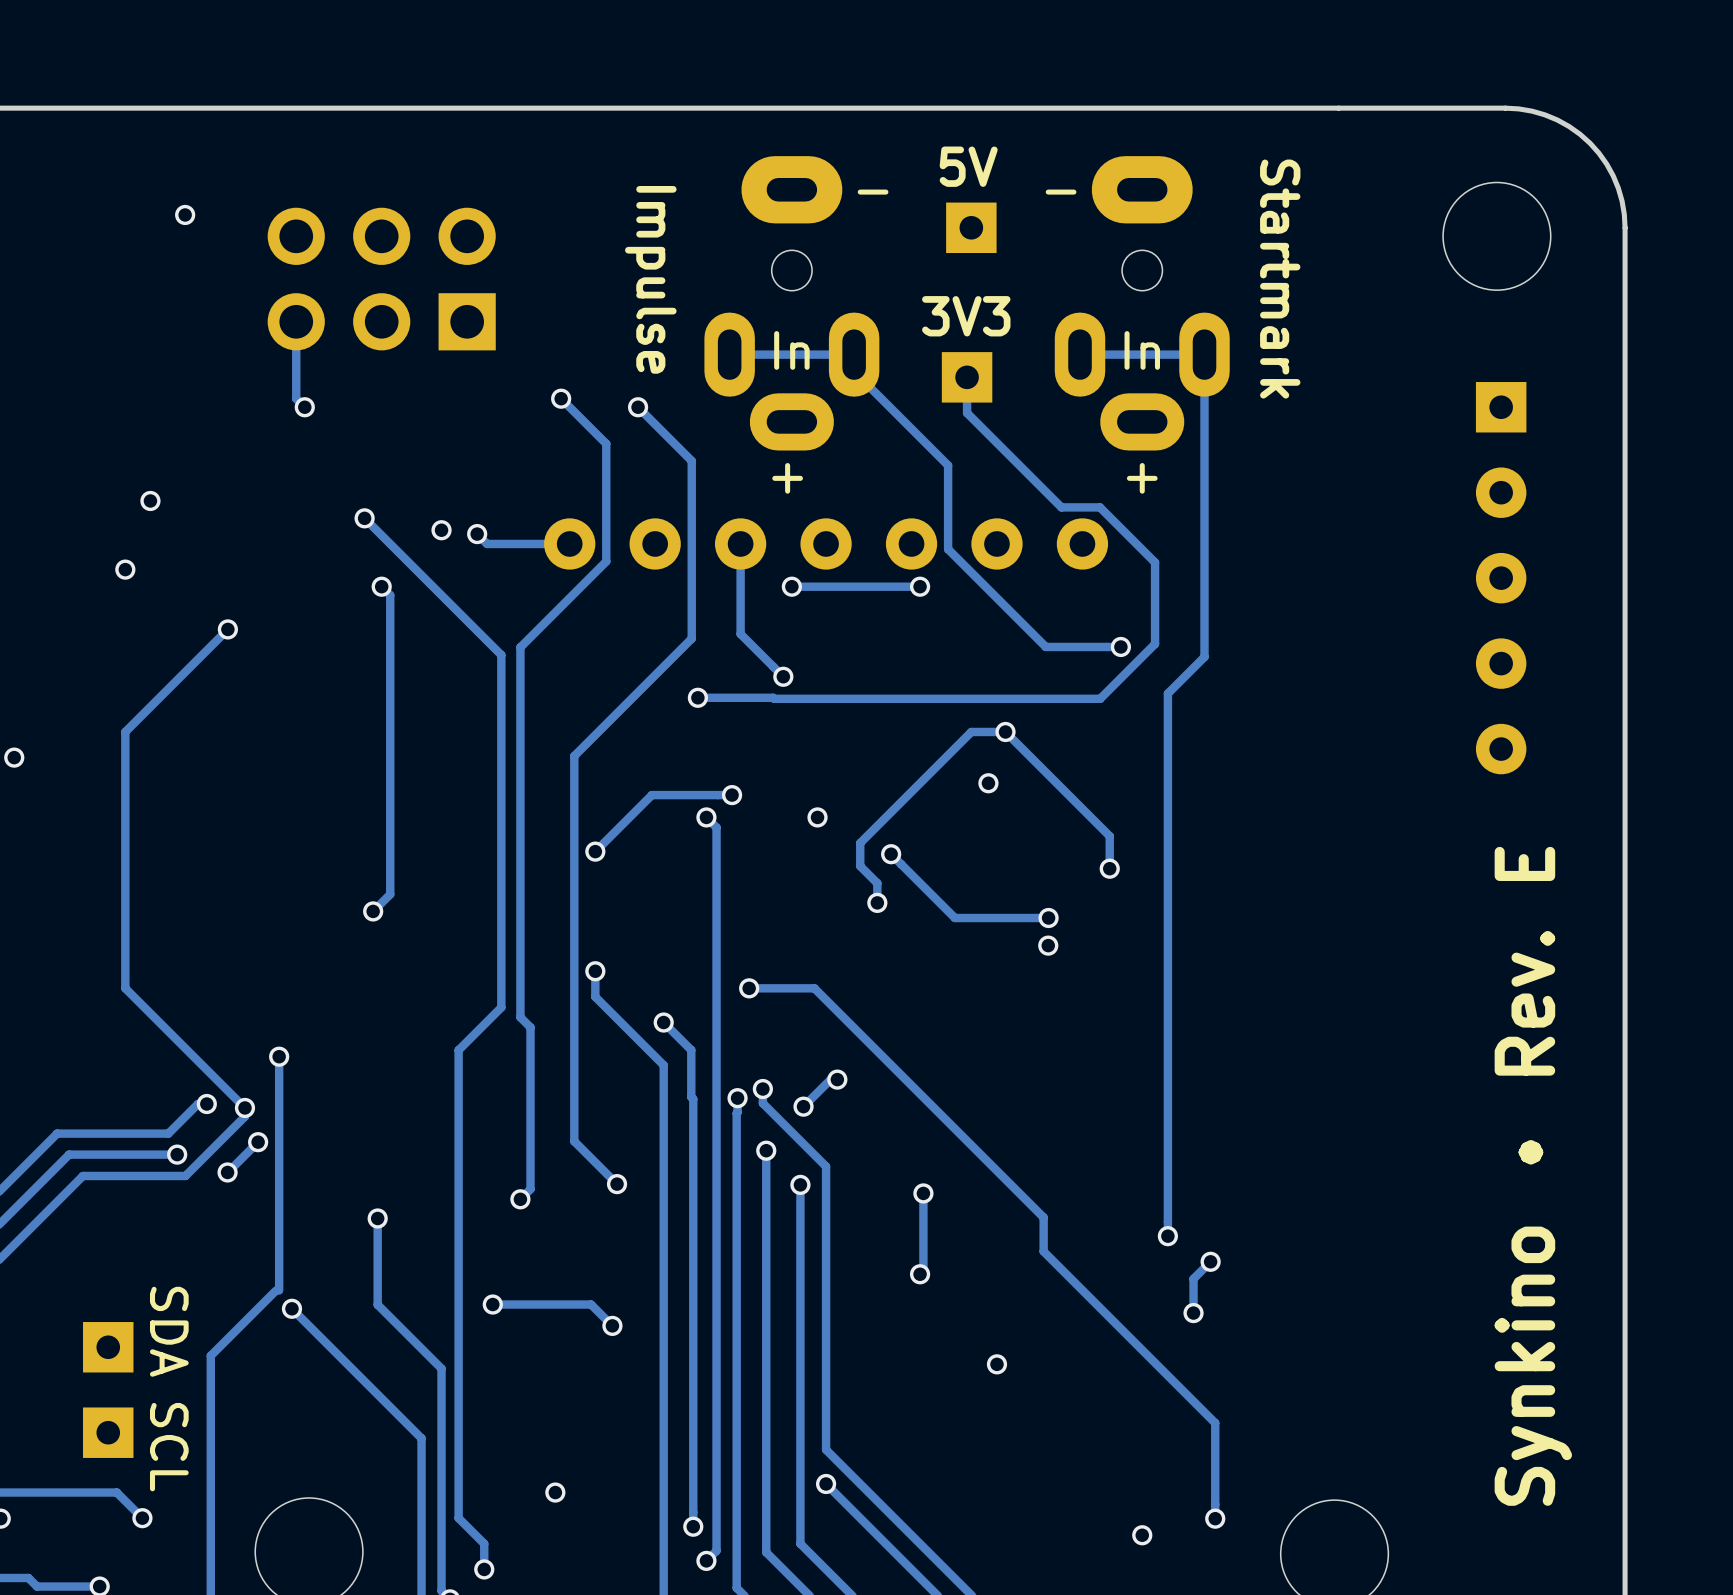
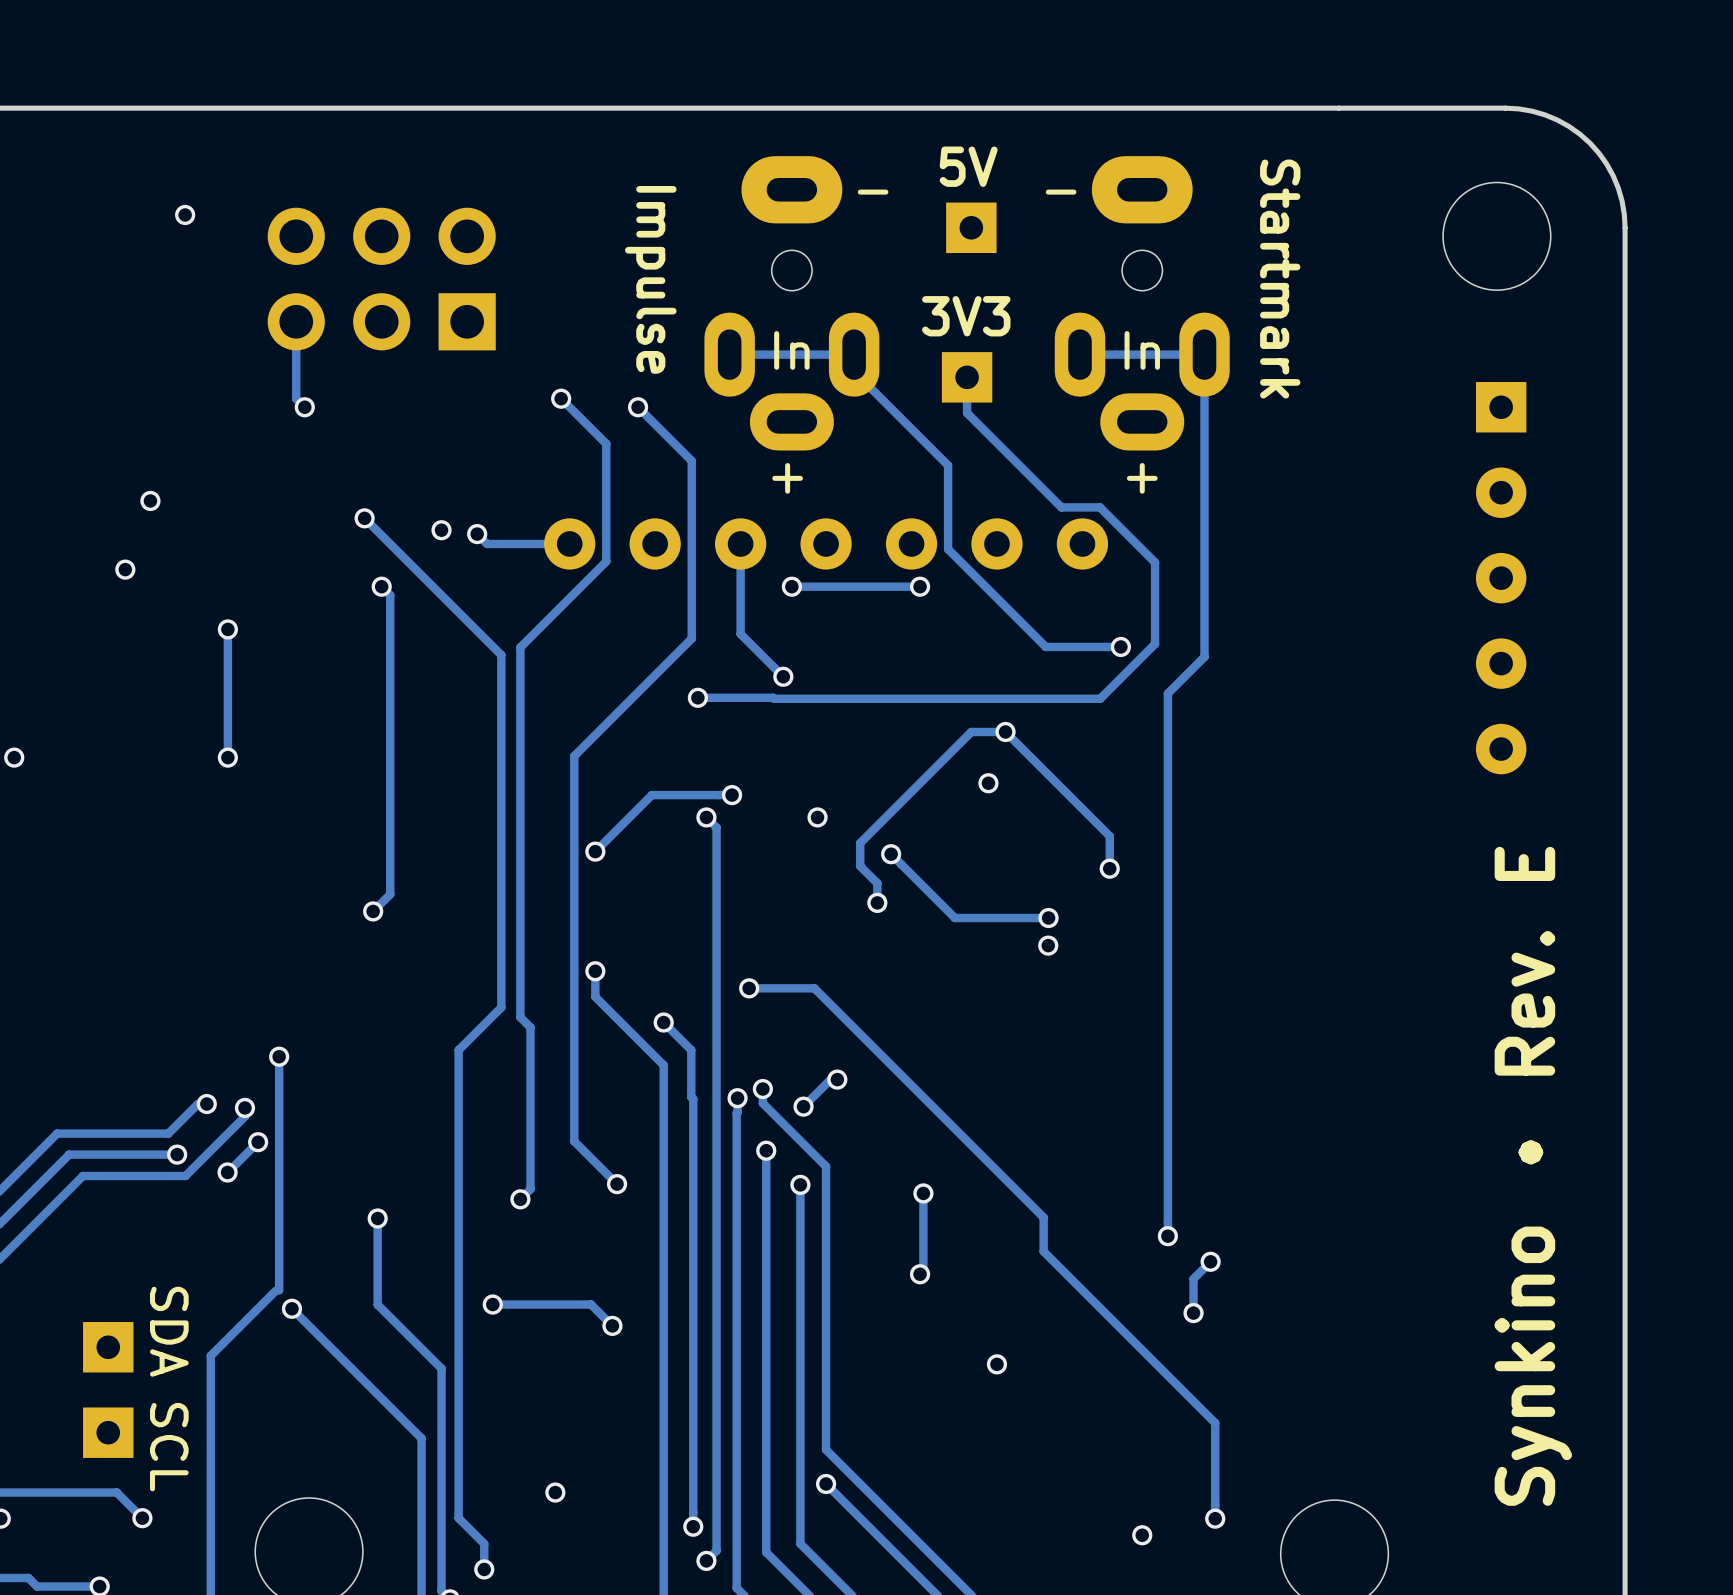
track: (227, 629) (125, 731) (125, 988) (244, 1107) -> (227, 629) (227, 757)
via: none -> (227, 757)

